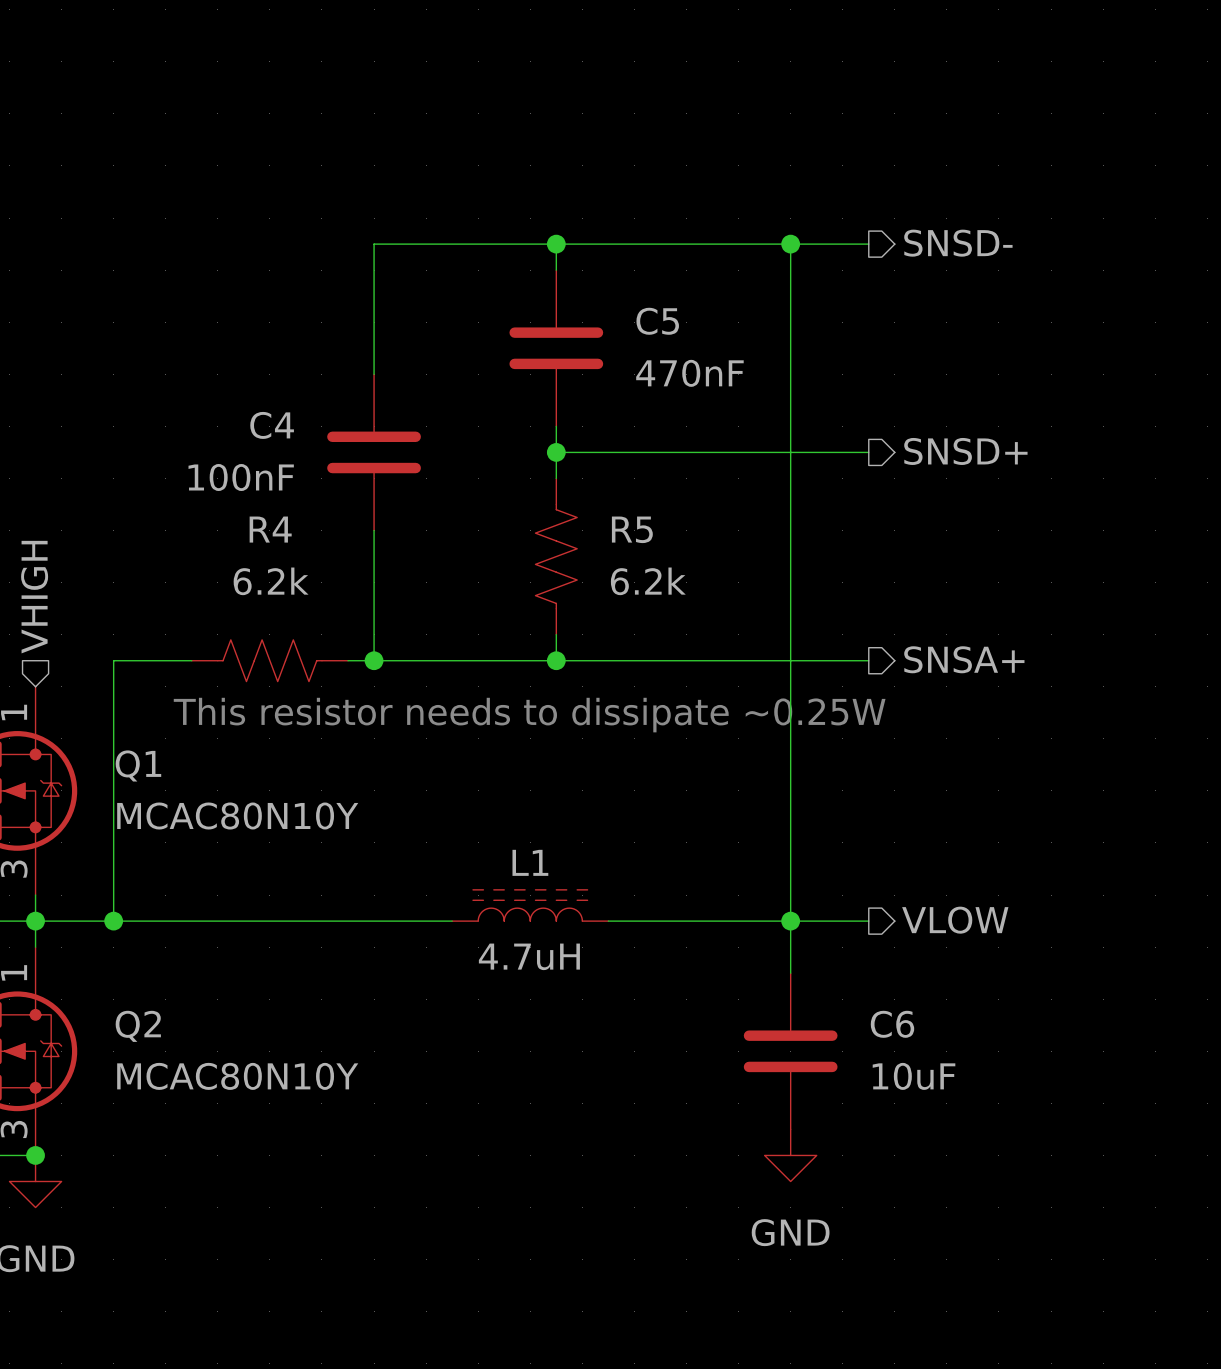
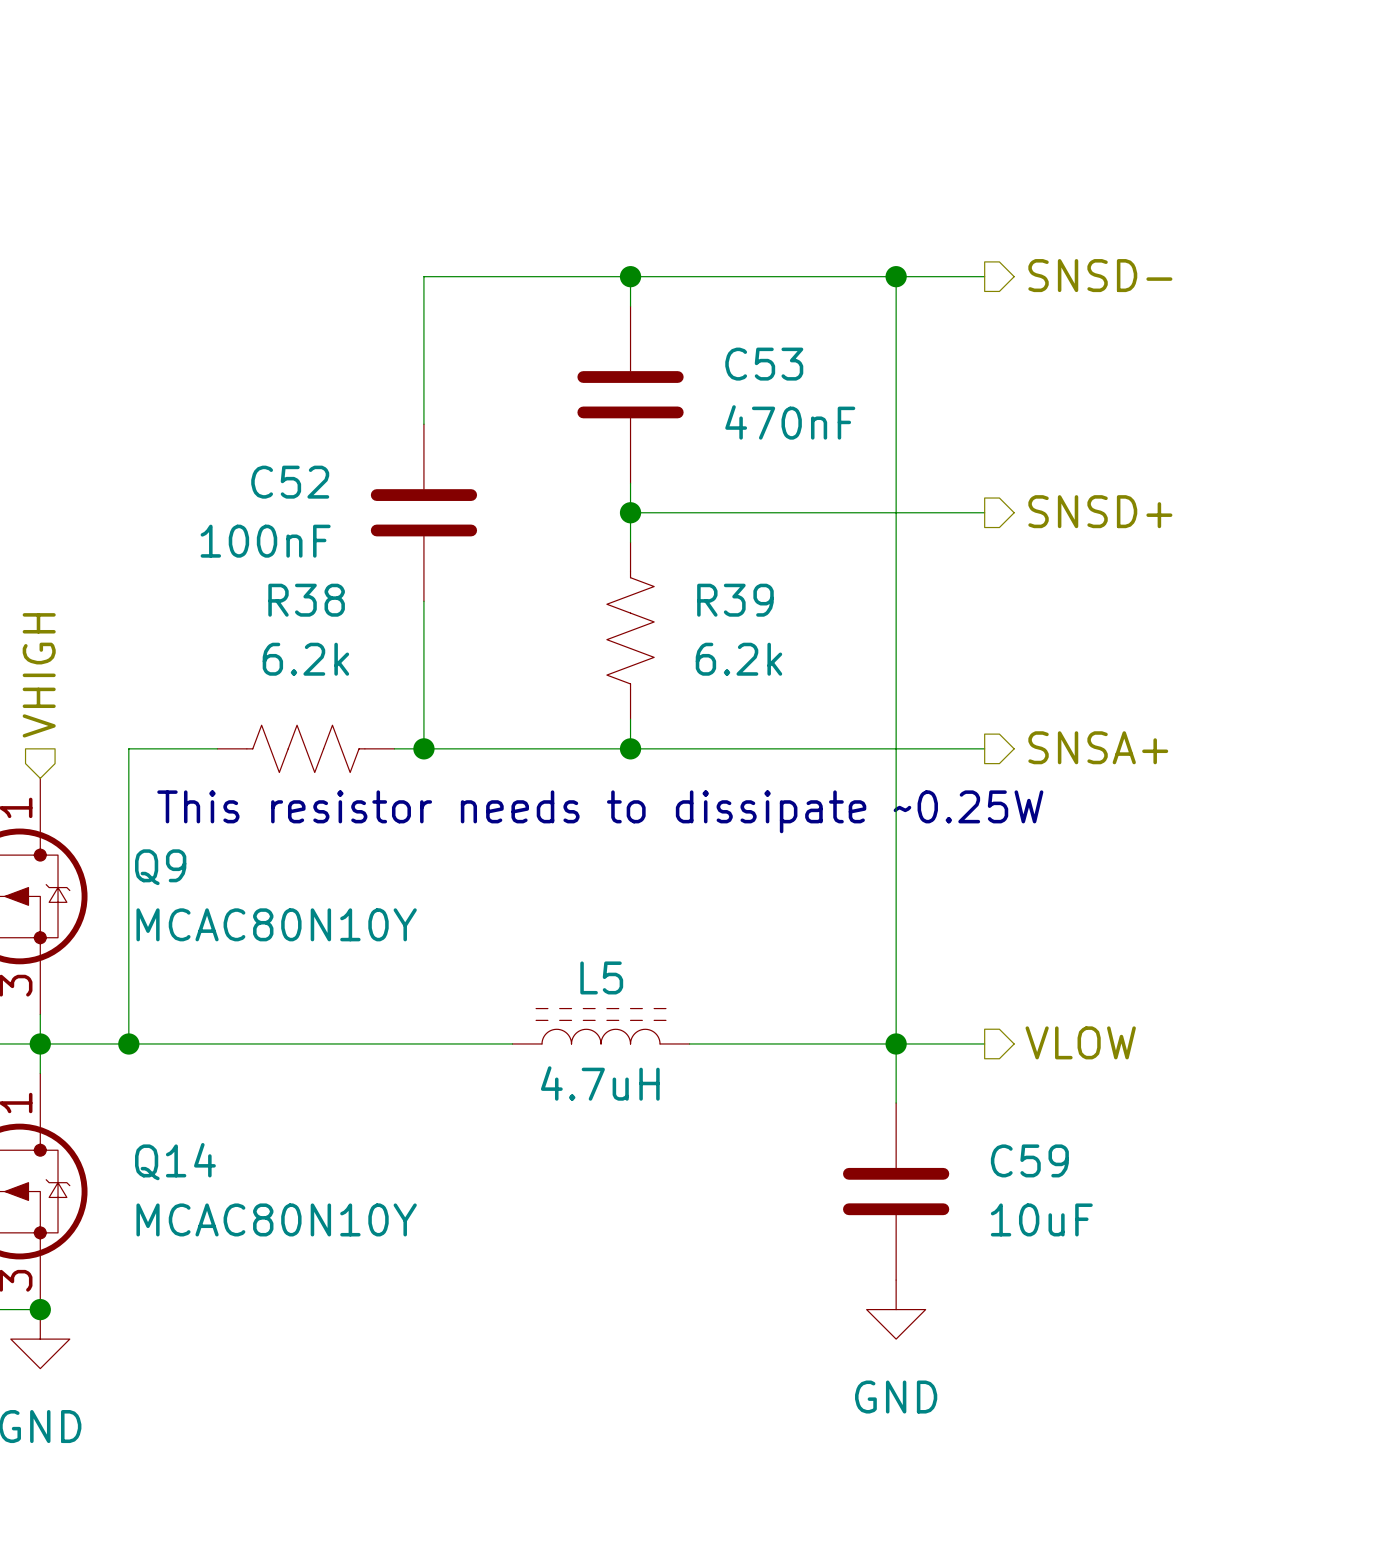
C5 name: C5 (657, 321) -> C53 (764, 364)
C4 name: C4 (272, 425) -> C52 (290, 482)
R4 name: R4 (270, 529) -> R38 (306, 600)
R5 name: R5 (632, 529) -> R39 (735, 600)
Q1 name: Q1 (138, 765) -> Q9 (160, 867)
L1 name: L1 (530, 862) -> L5 (601, 977)
C6 name: C6 (892, 1024) -> C59 (1029, 1160)
Q2 name: Q2 (138, 1026) -> Q14 (175, 1161)

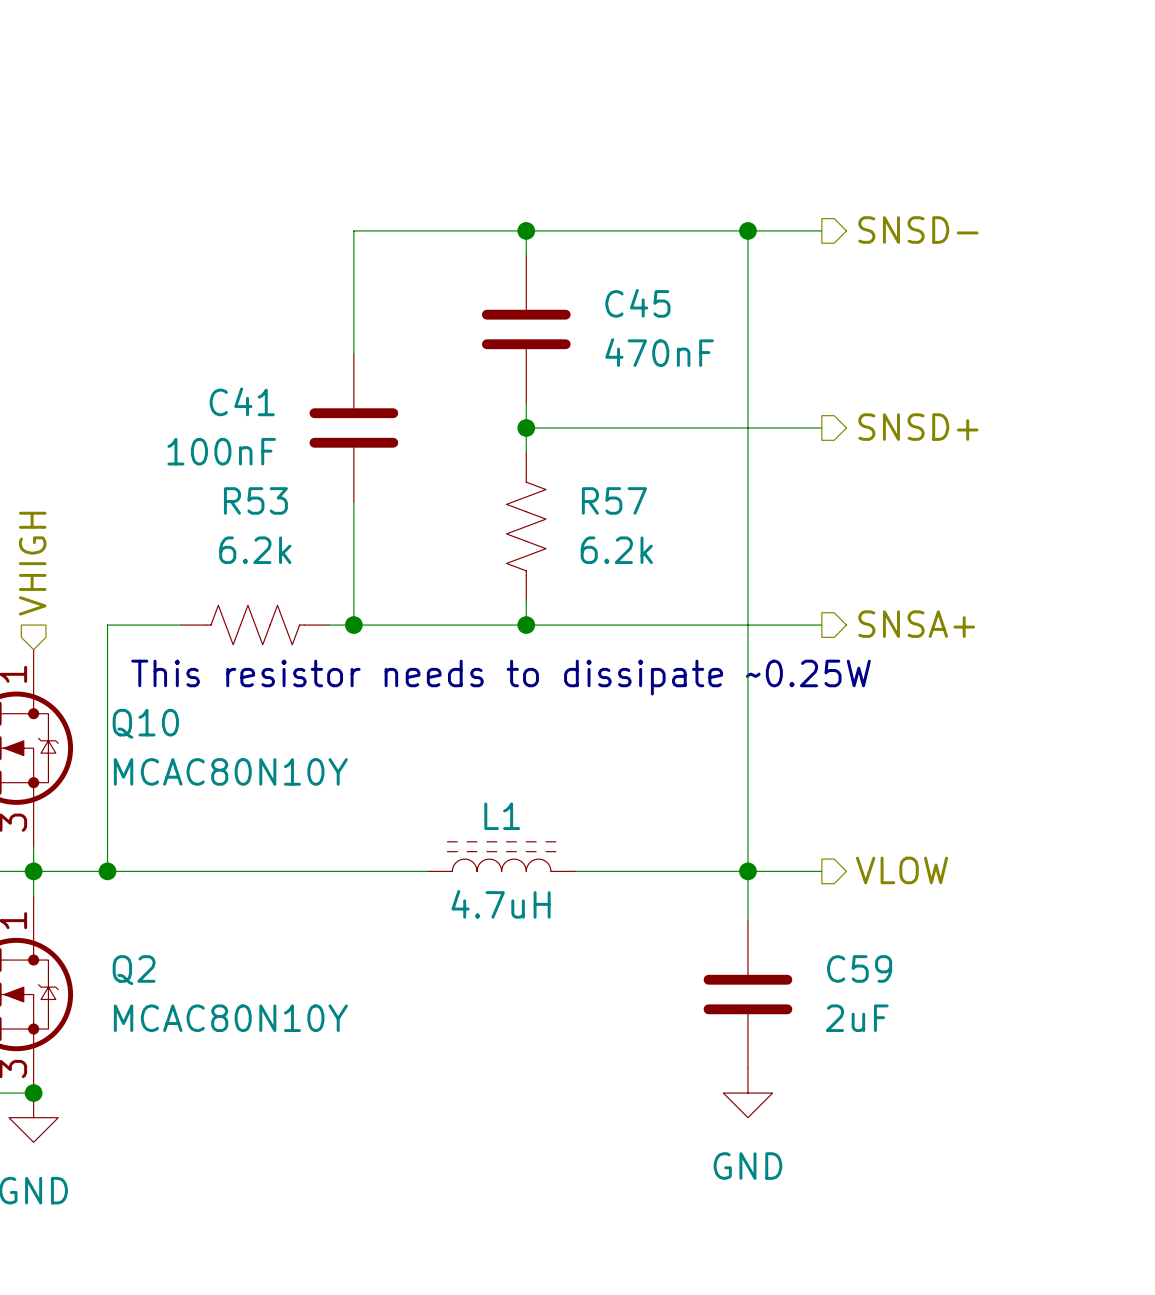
C53 name: C53 (764, 364) -> C45 (637, 303)
C52 name: C52 (290, 482) -> C41 (242, 401)
R38 name: R38 (306, 600) -> R53 (255, 500)
R39 name: R39 (735, 600) -> R57 (614, 500)
Q9 name: Q9 (160, 867) -> Q10 (145, 723)
L5 name: L5 (601, 977) -> L1 (502, 816)
Q14 name: Q14 (175, 1161) -> Q2 (134, 970)
C59 value: 10uF (1041, 1219) -> 2uF (857, 1018)

